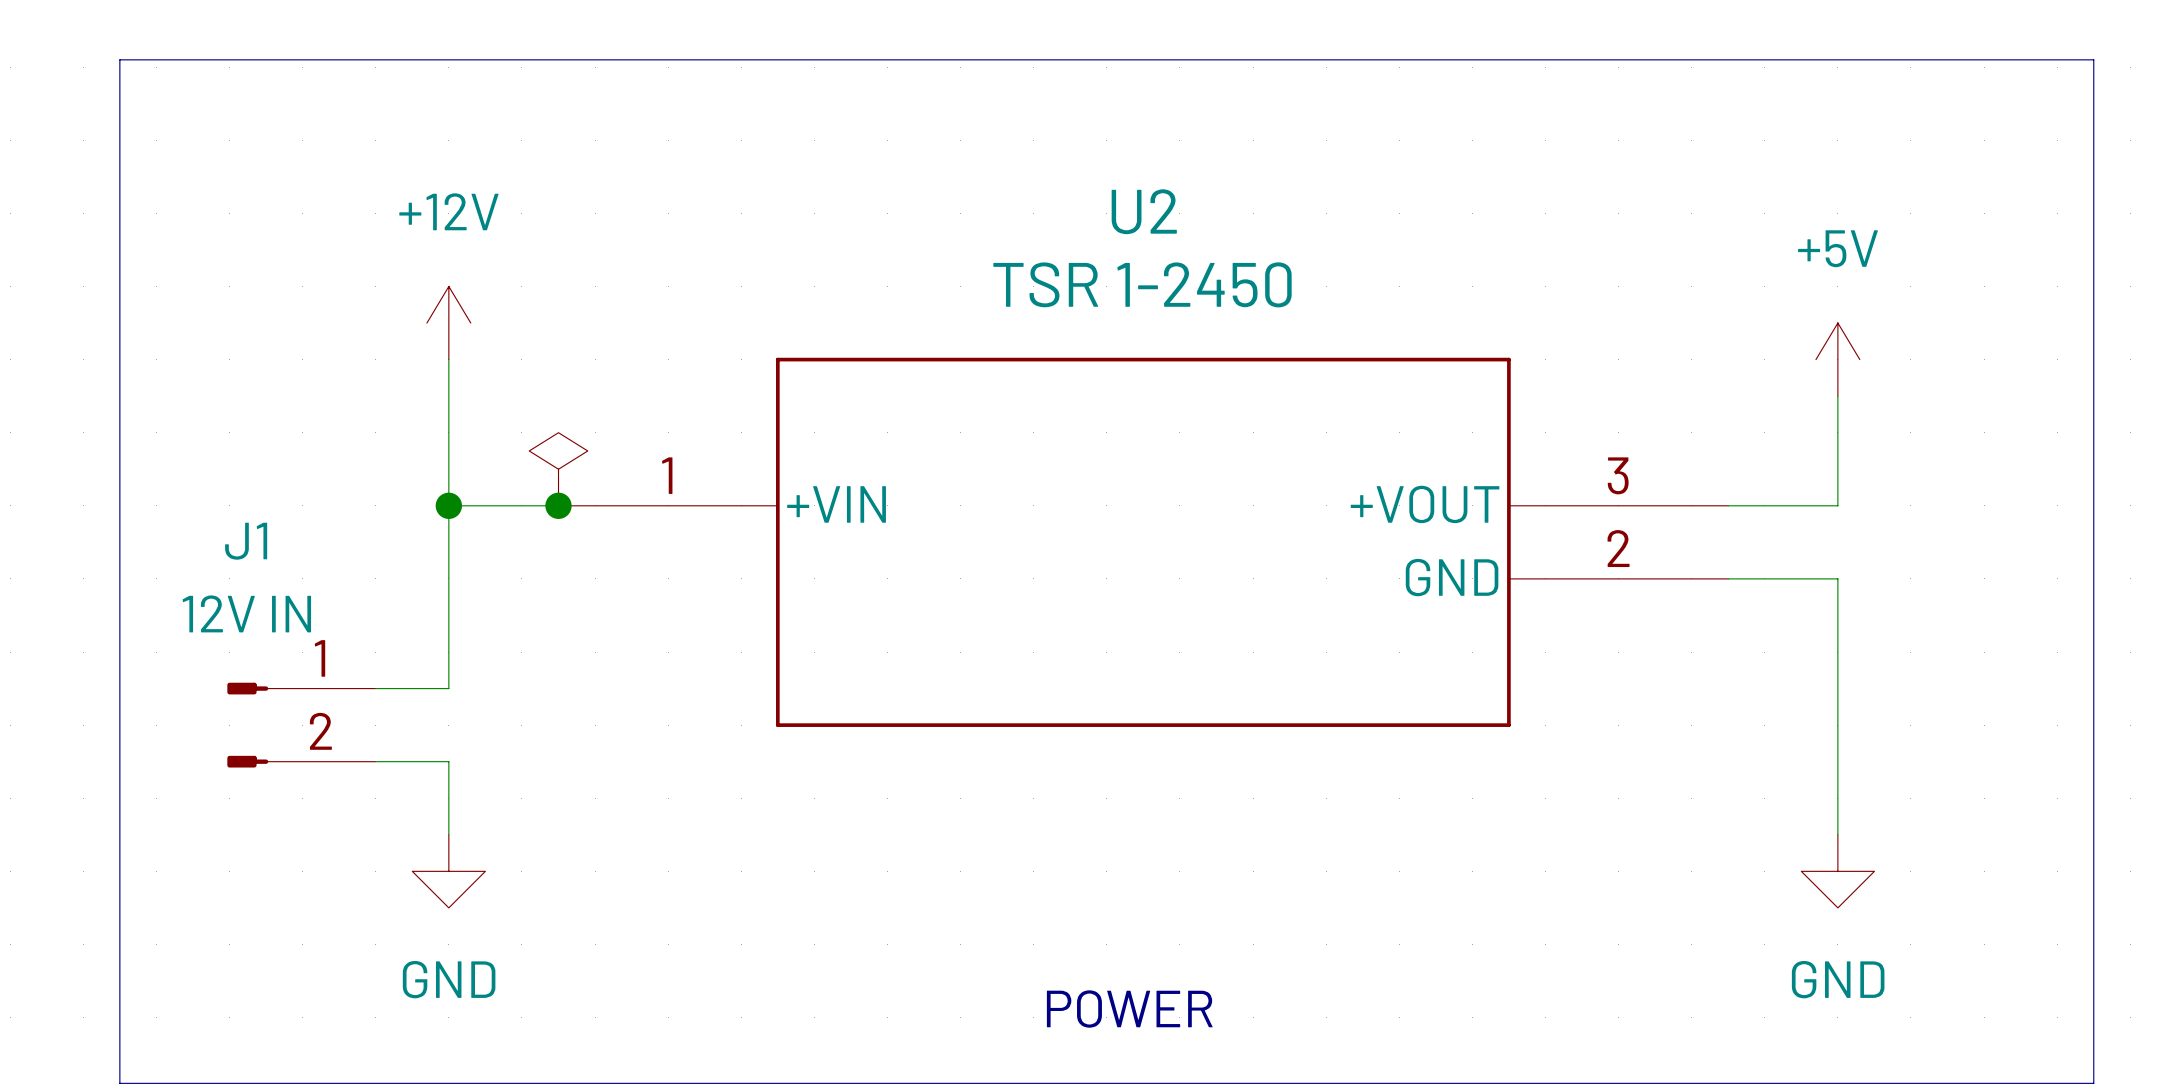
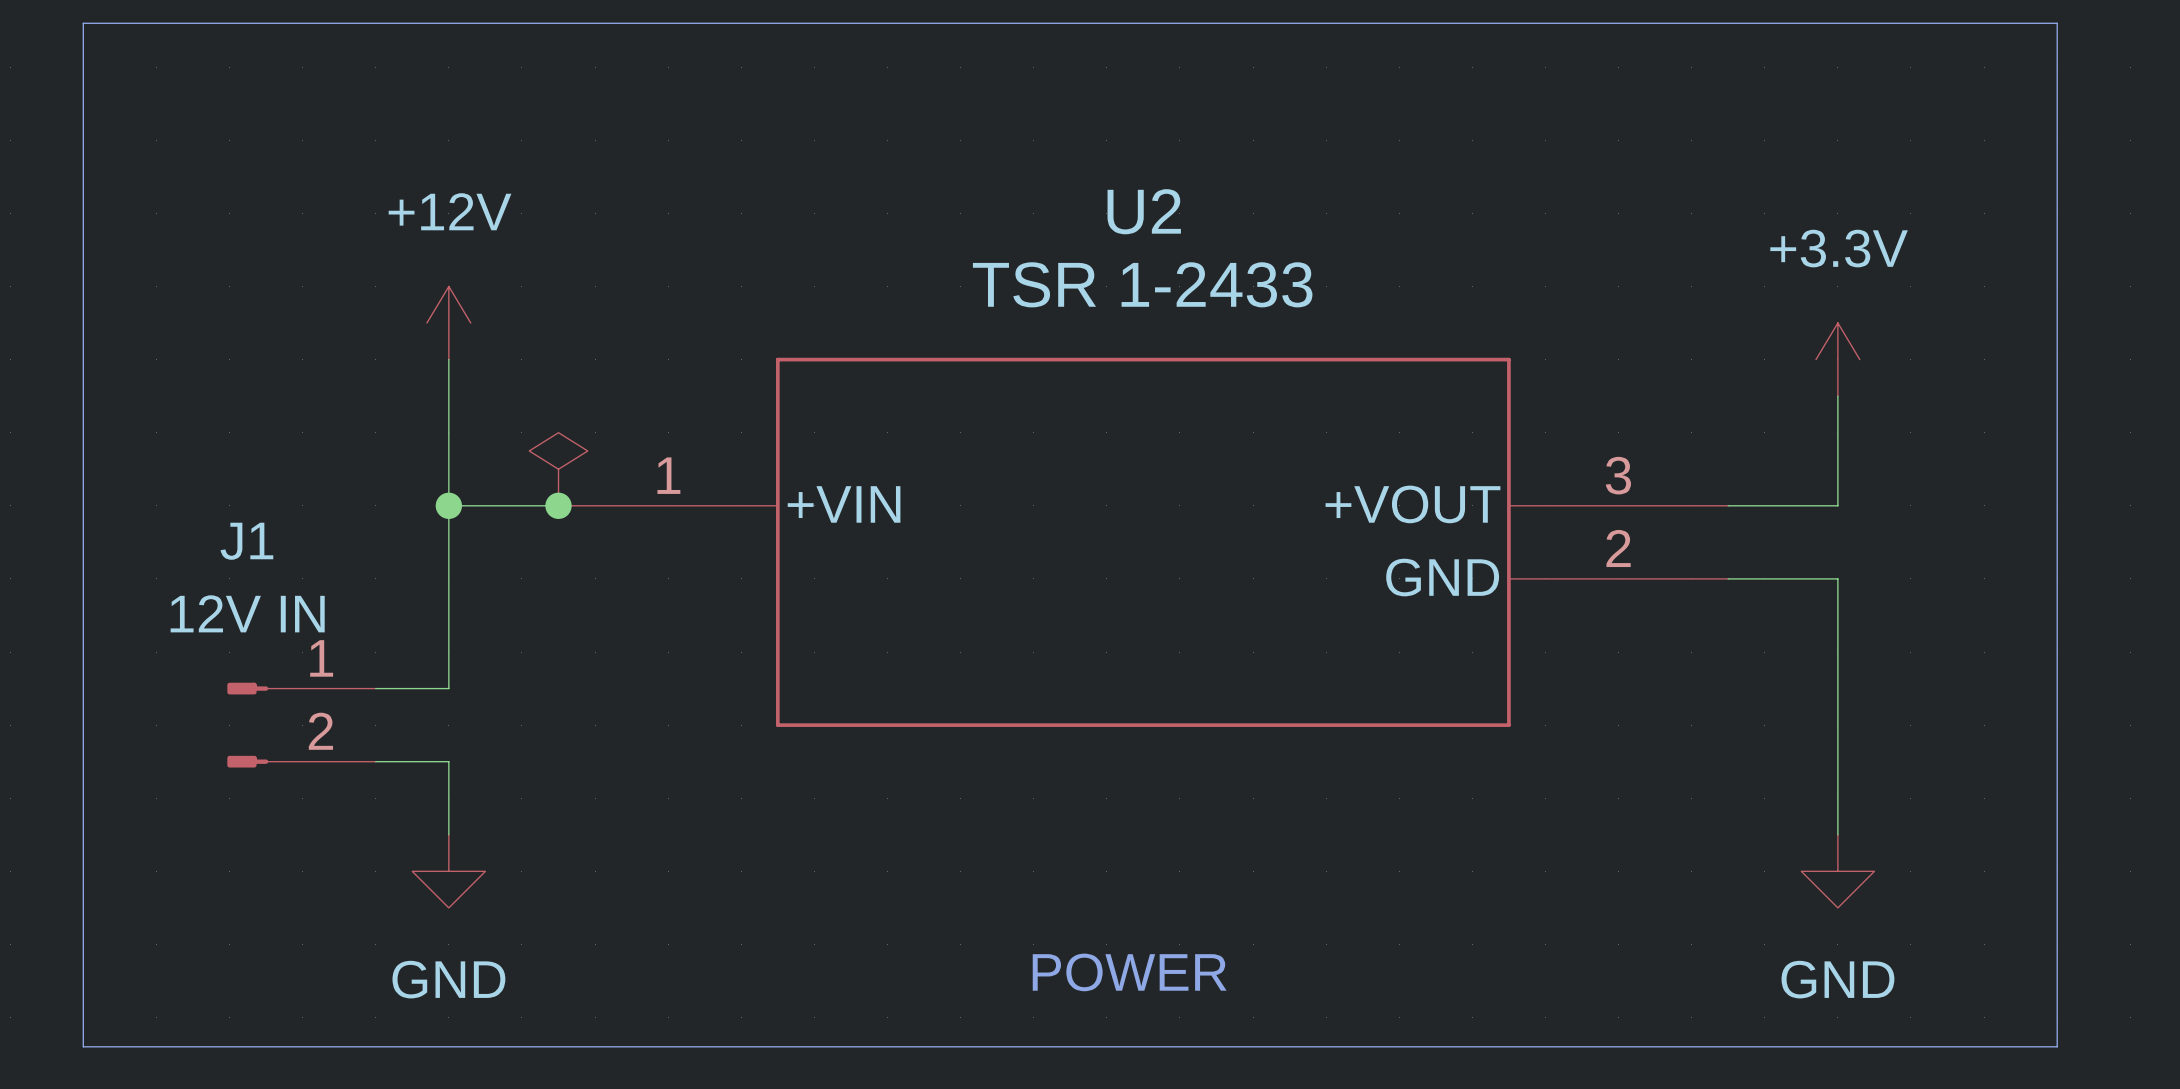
line: (119, 59) (2093, 59) (2093, 1083) (119, 1083) (119, 59) -> (83, 23) (2057, 23) (2057, 1046) (83, 1046) (83, 23)
U2 value: TSR 1-2450 (1142, 284) -> TSR 1-2433 (1142, 284)
power symbol: +5V (1837, 359) -> +3.3V (1837, 359)
text position: POWER (1129, 1009) -> POWER (1129, 972)

